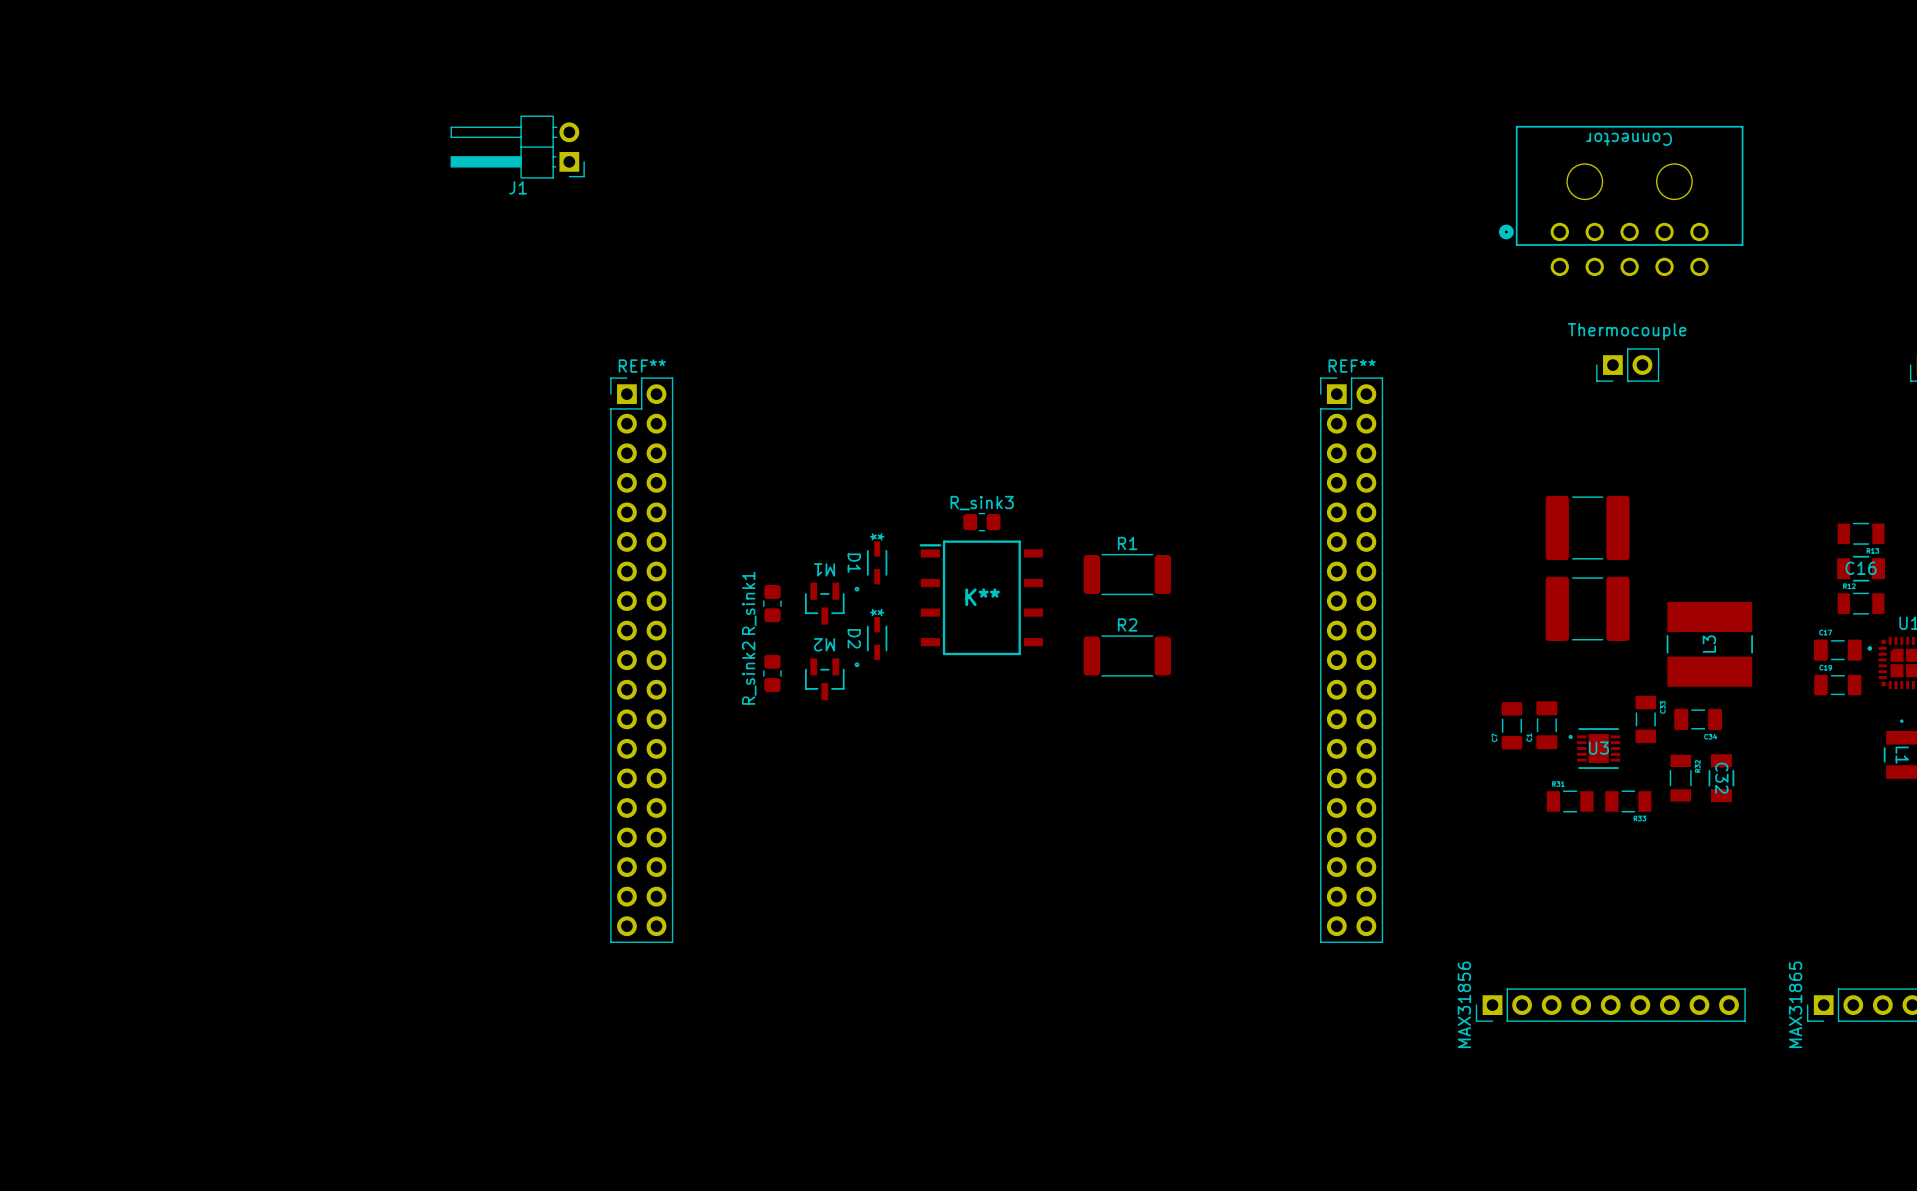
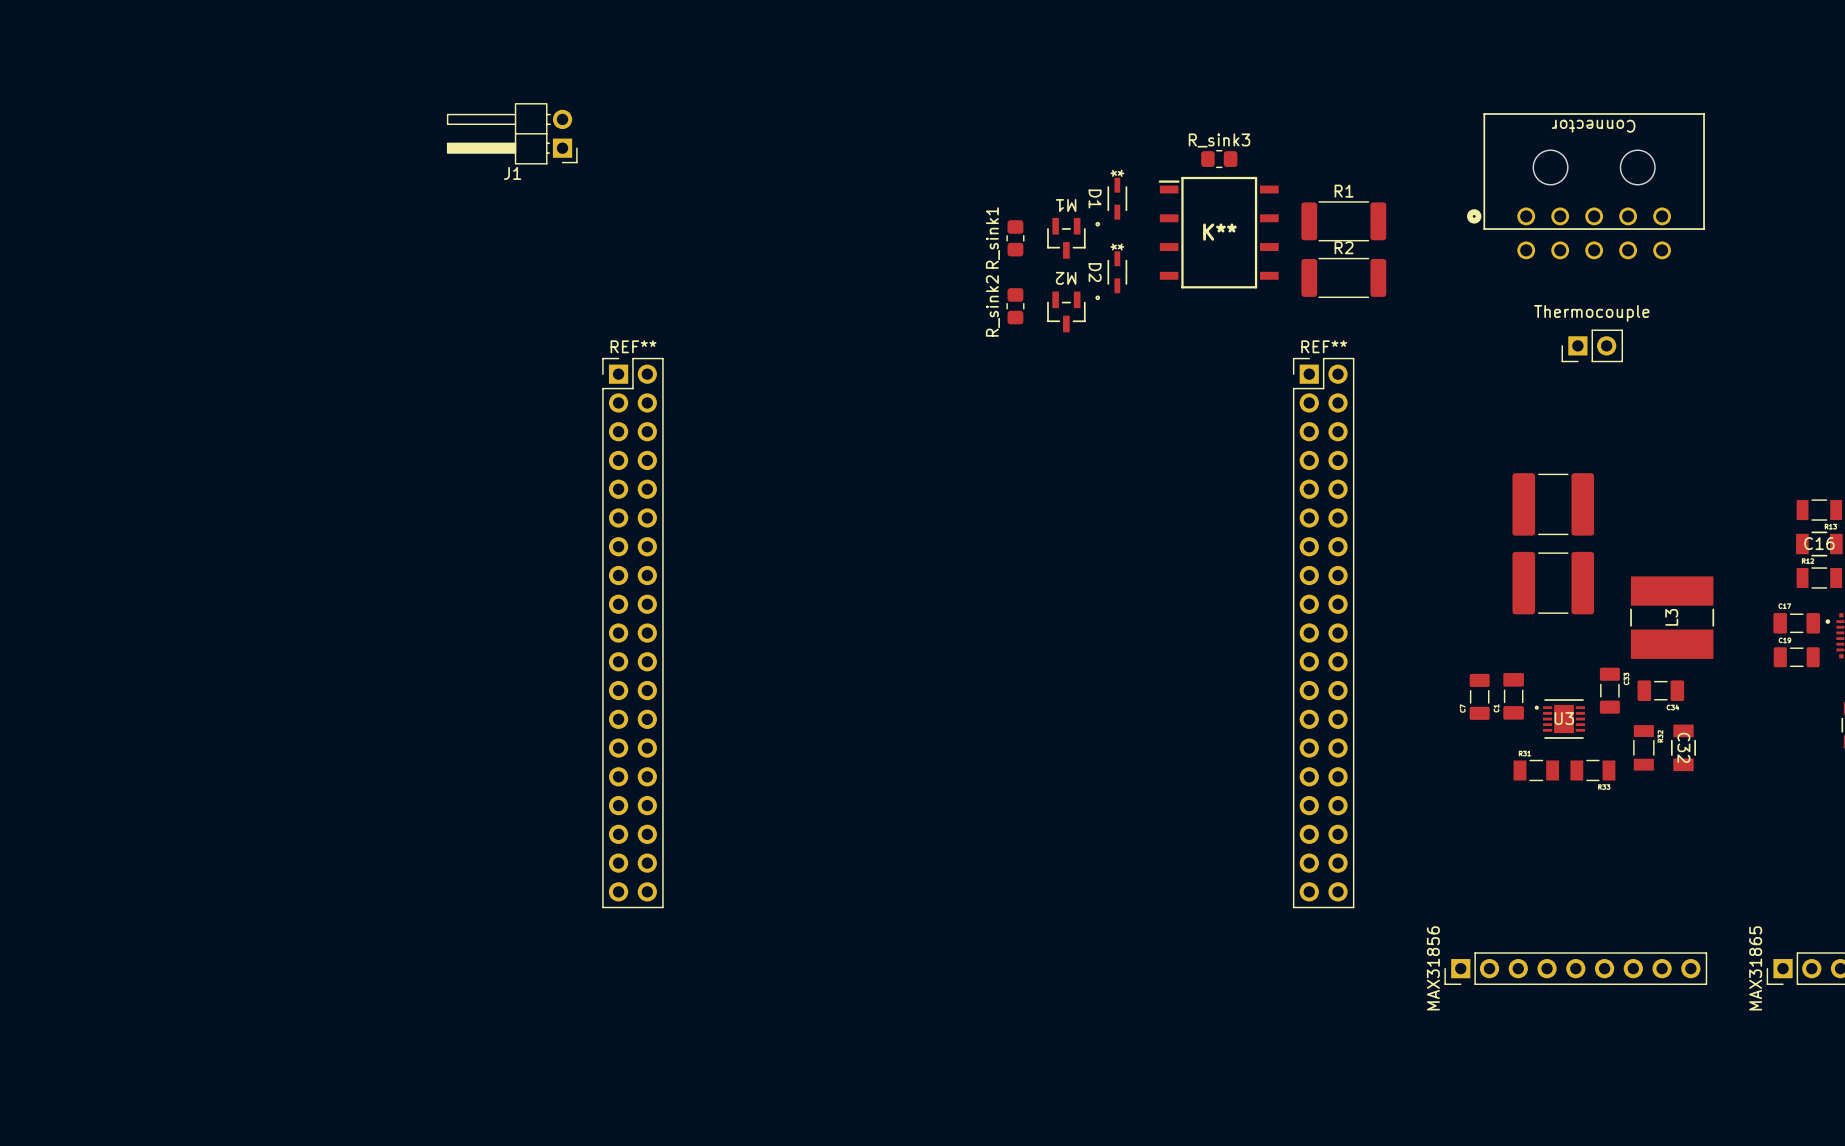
K**: none -> (1218, 232)
R_sink3 position: (981, 522) -> (1219, 159)
D1 position: (877, 562) -> (1117, 198)
R1 position: (1127, 574) -> (1343, 221)
K**: (981, 597) -> none
R_sink1 position: (772, 603) -> (1015, 238)
M1 position: (832, 603) -> (1073, 238)
D2 position: (877, 638) -> (1117, 272)
R2 position: (1127, 655) -> (1343, 277)
R_sink2 position: (772, 673) -> (1015, 306)
M2 position: (832, 679) -> (1073, 311)

